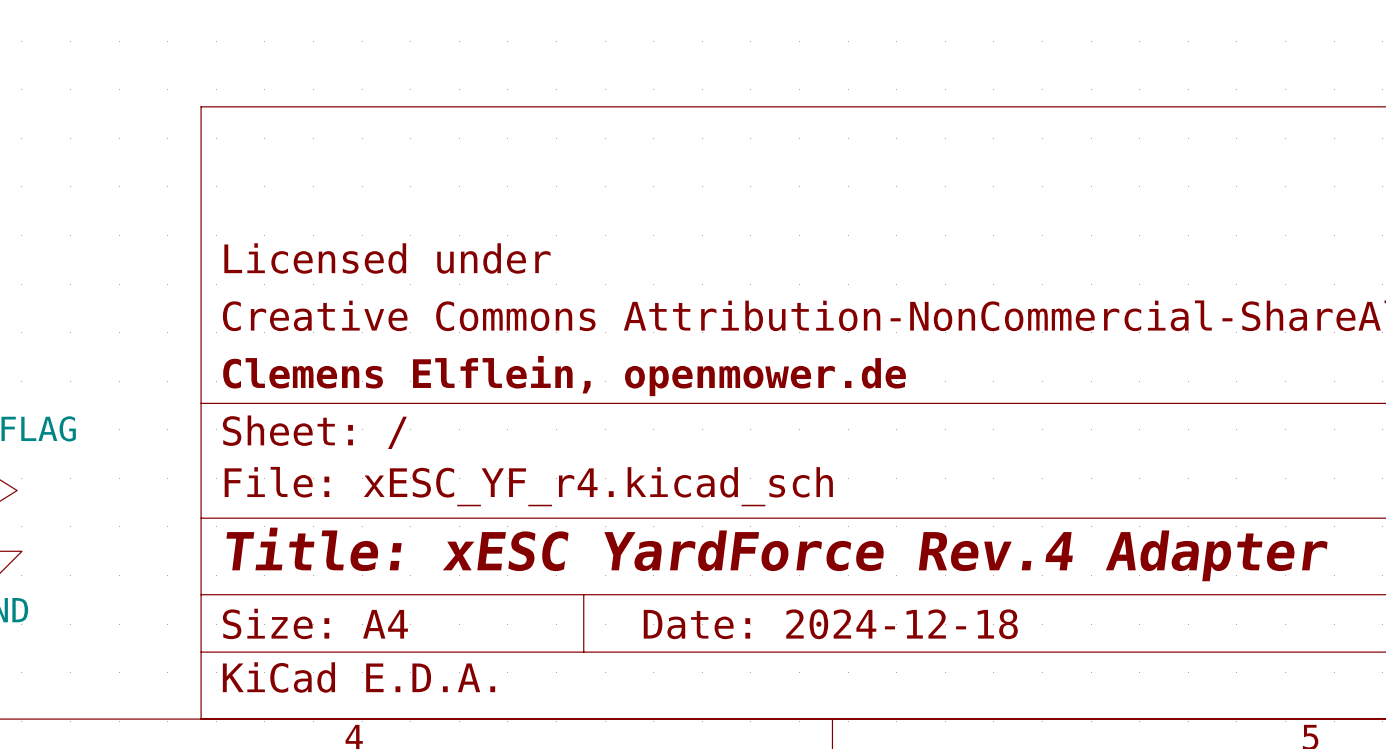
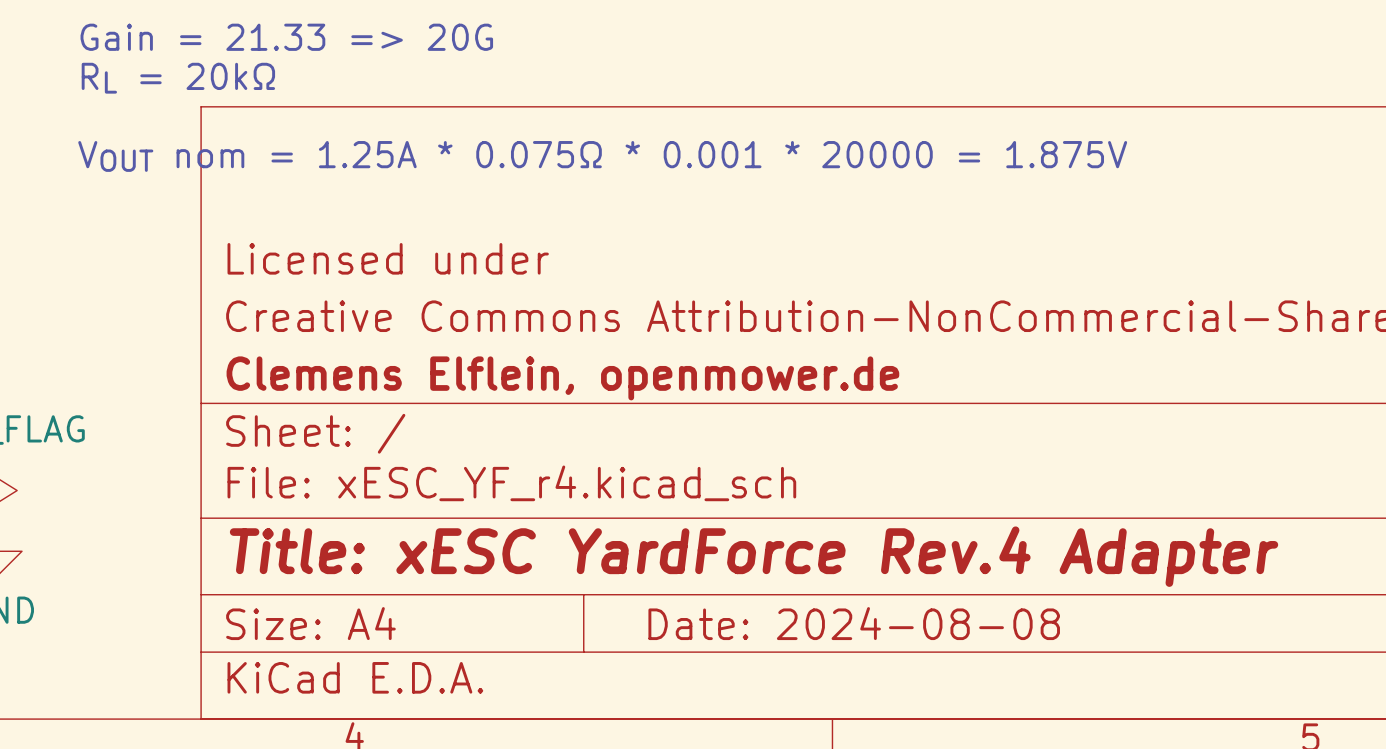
text: none -> Gain = 21.33 => 20G (286, 37)
text: none -> RL = 20kΩ (178, 78)
text: none -> VOUT nom = 1.25A * 0.075Ω * 0.001 * 20000 = 1.875V (602, 156)
title block: Date: 2024-12-18 (830, 624) -> Date: 2024-08-08 (854, 623)

